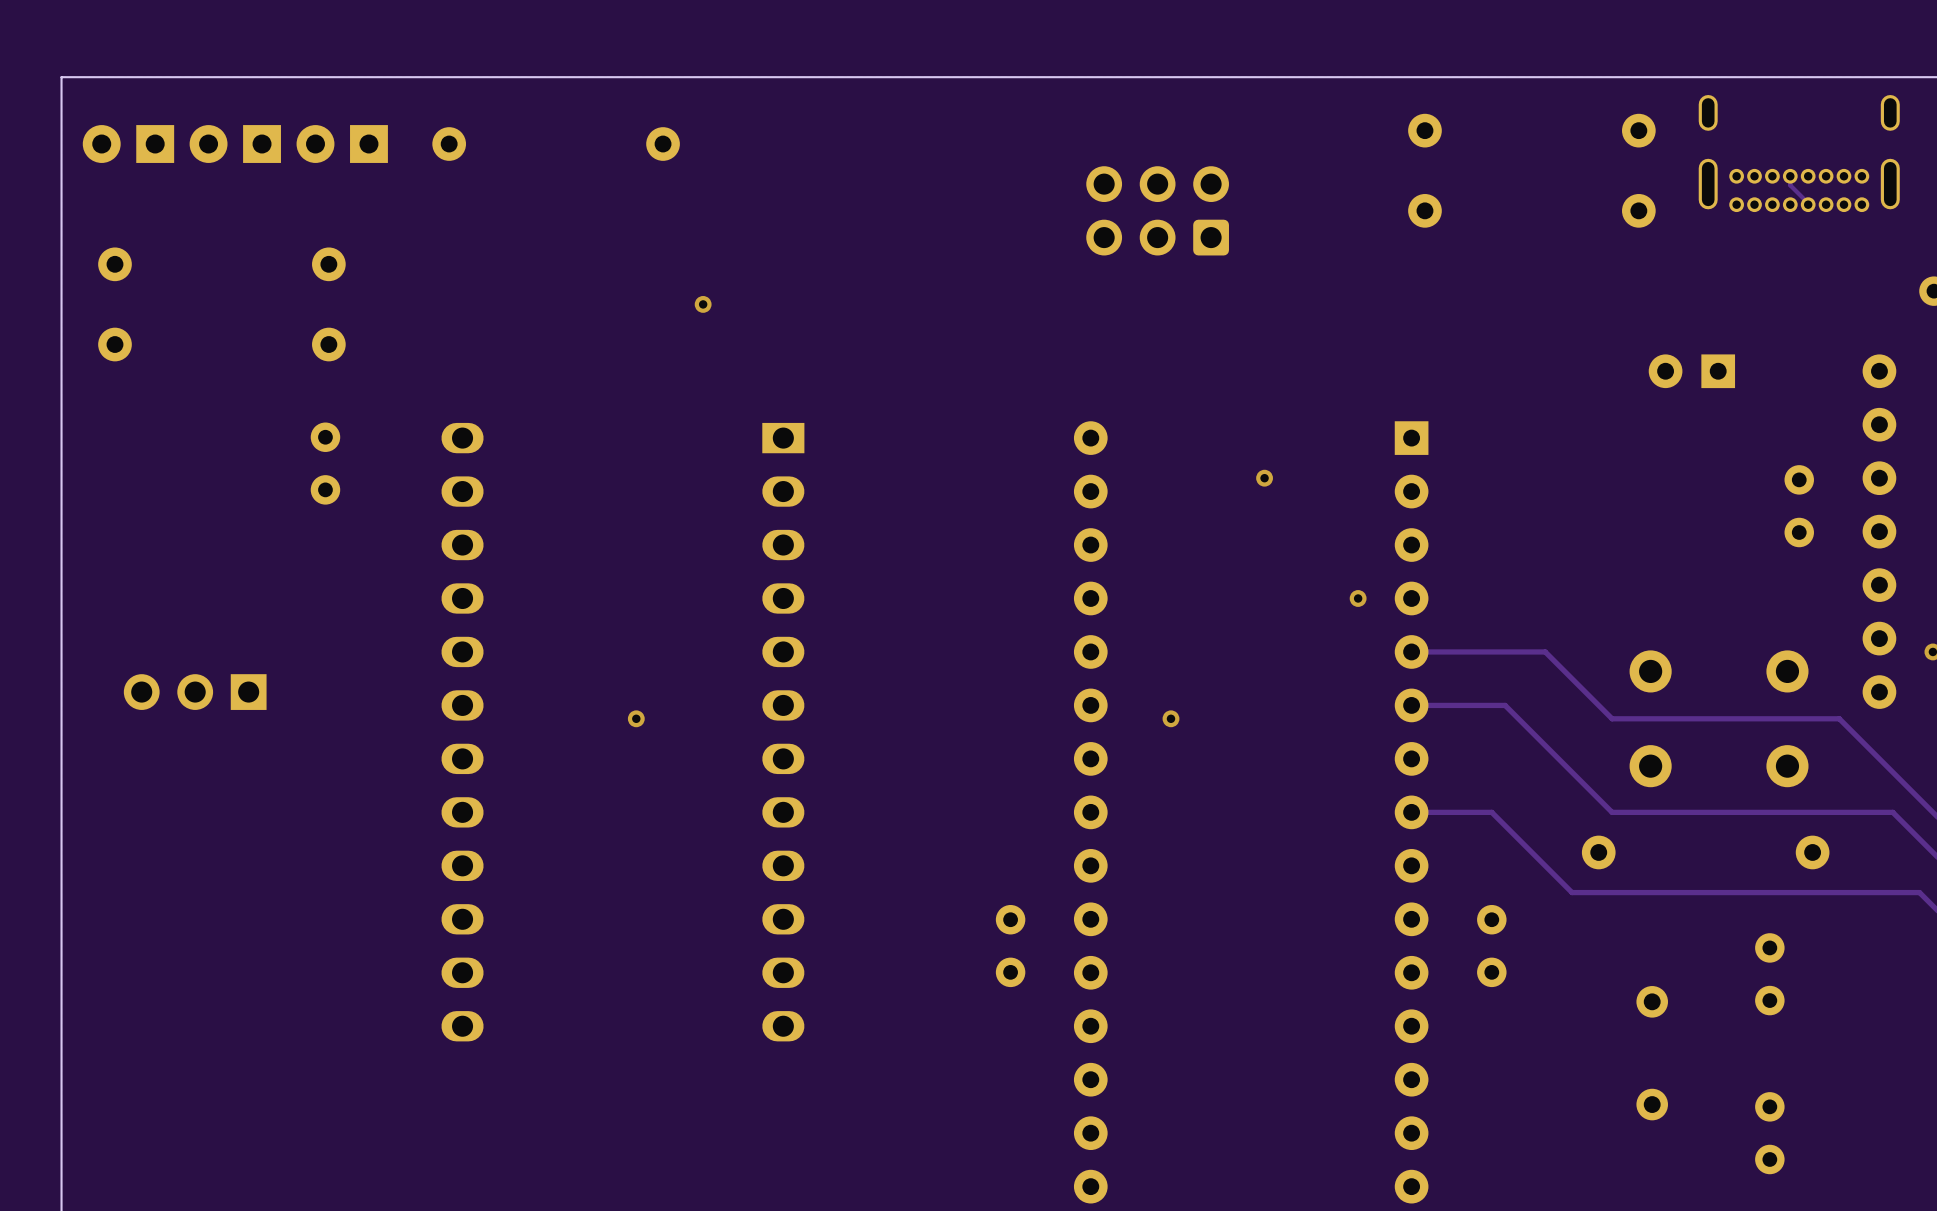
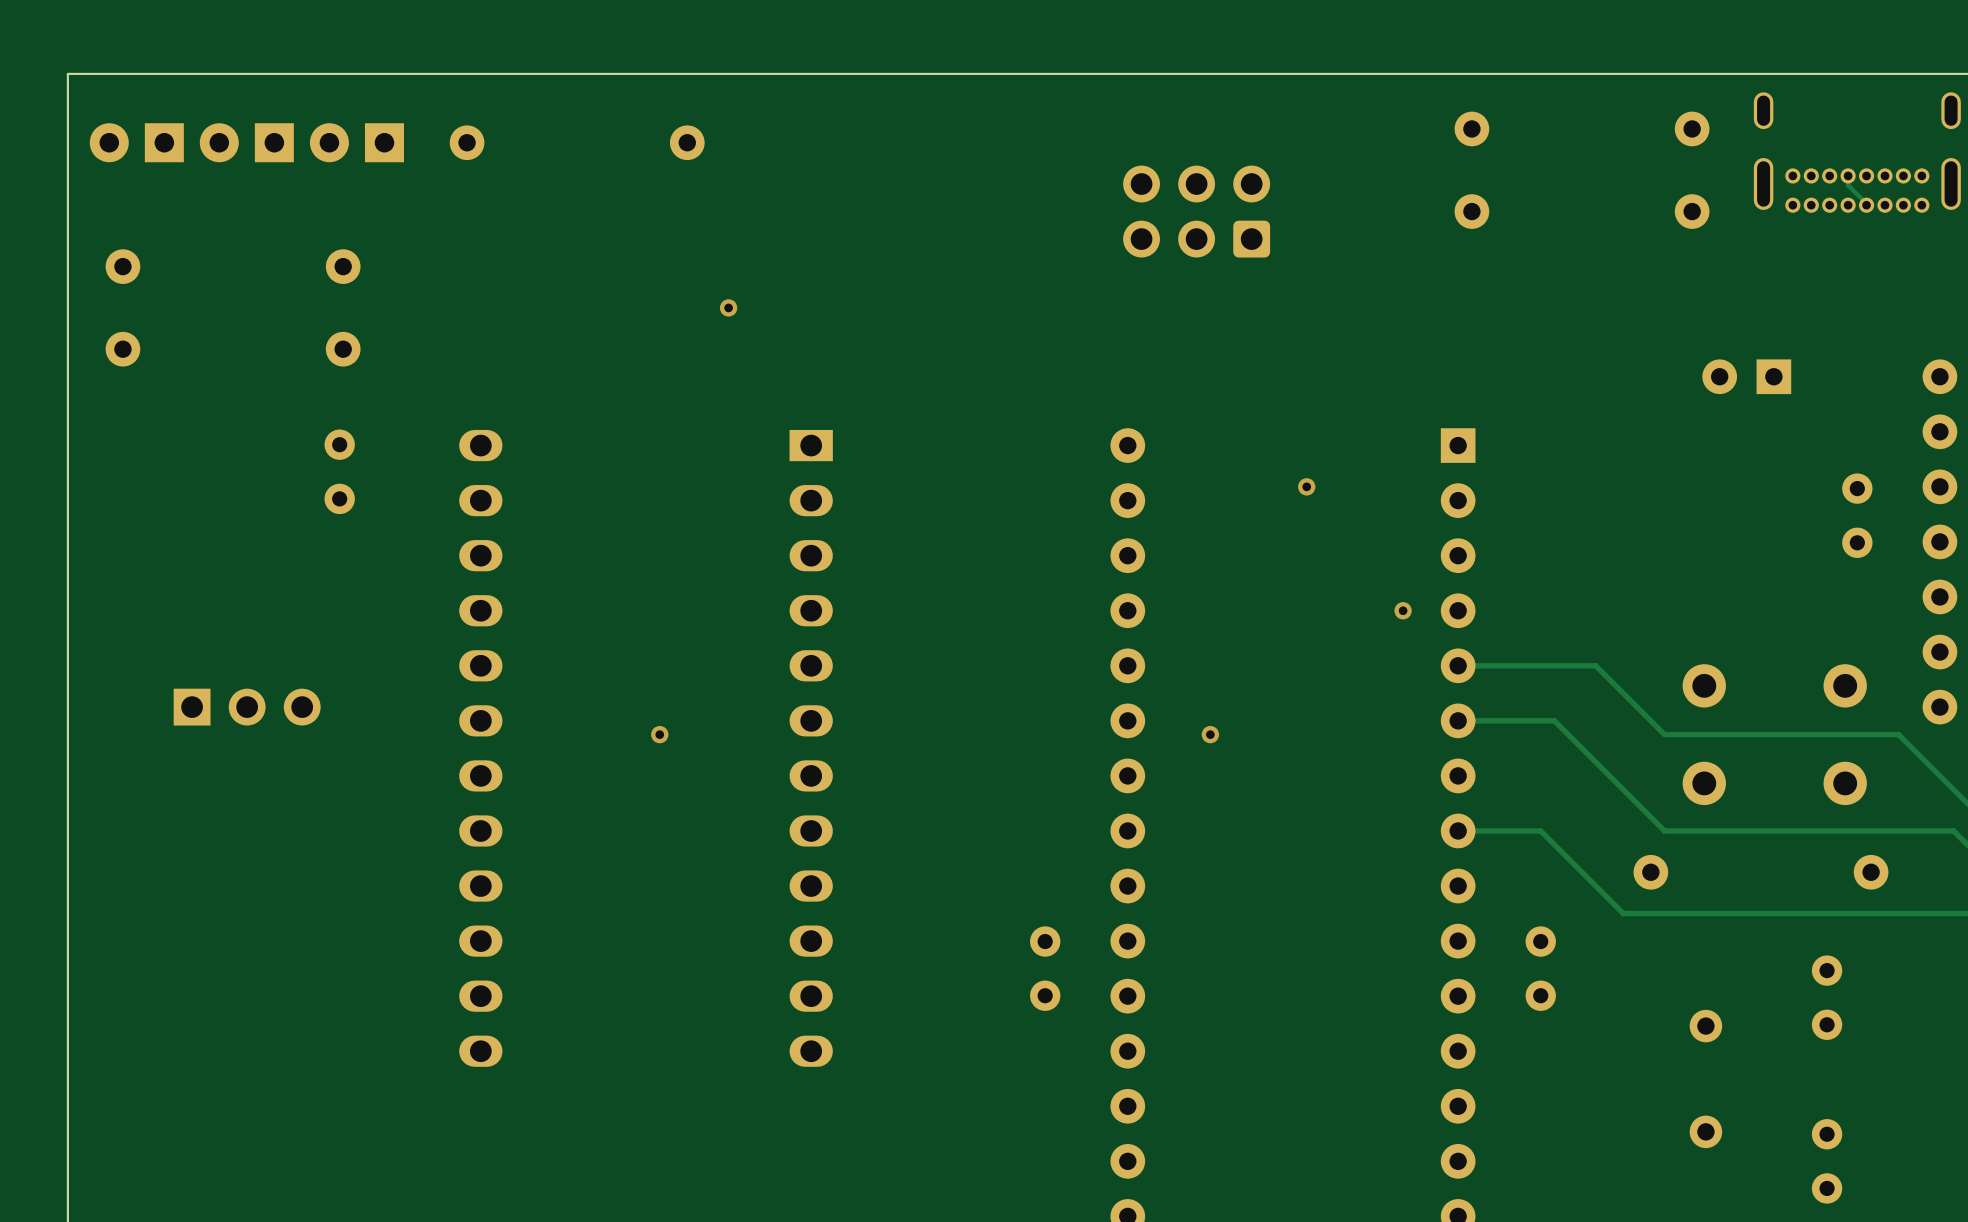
part rotation: 0° (195, 692) -> 180° (247, 707)

